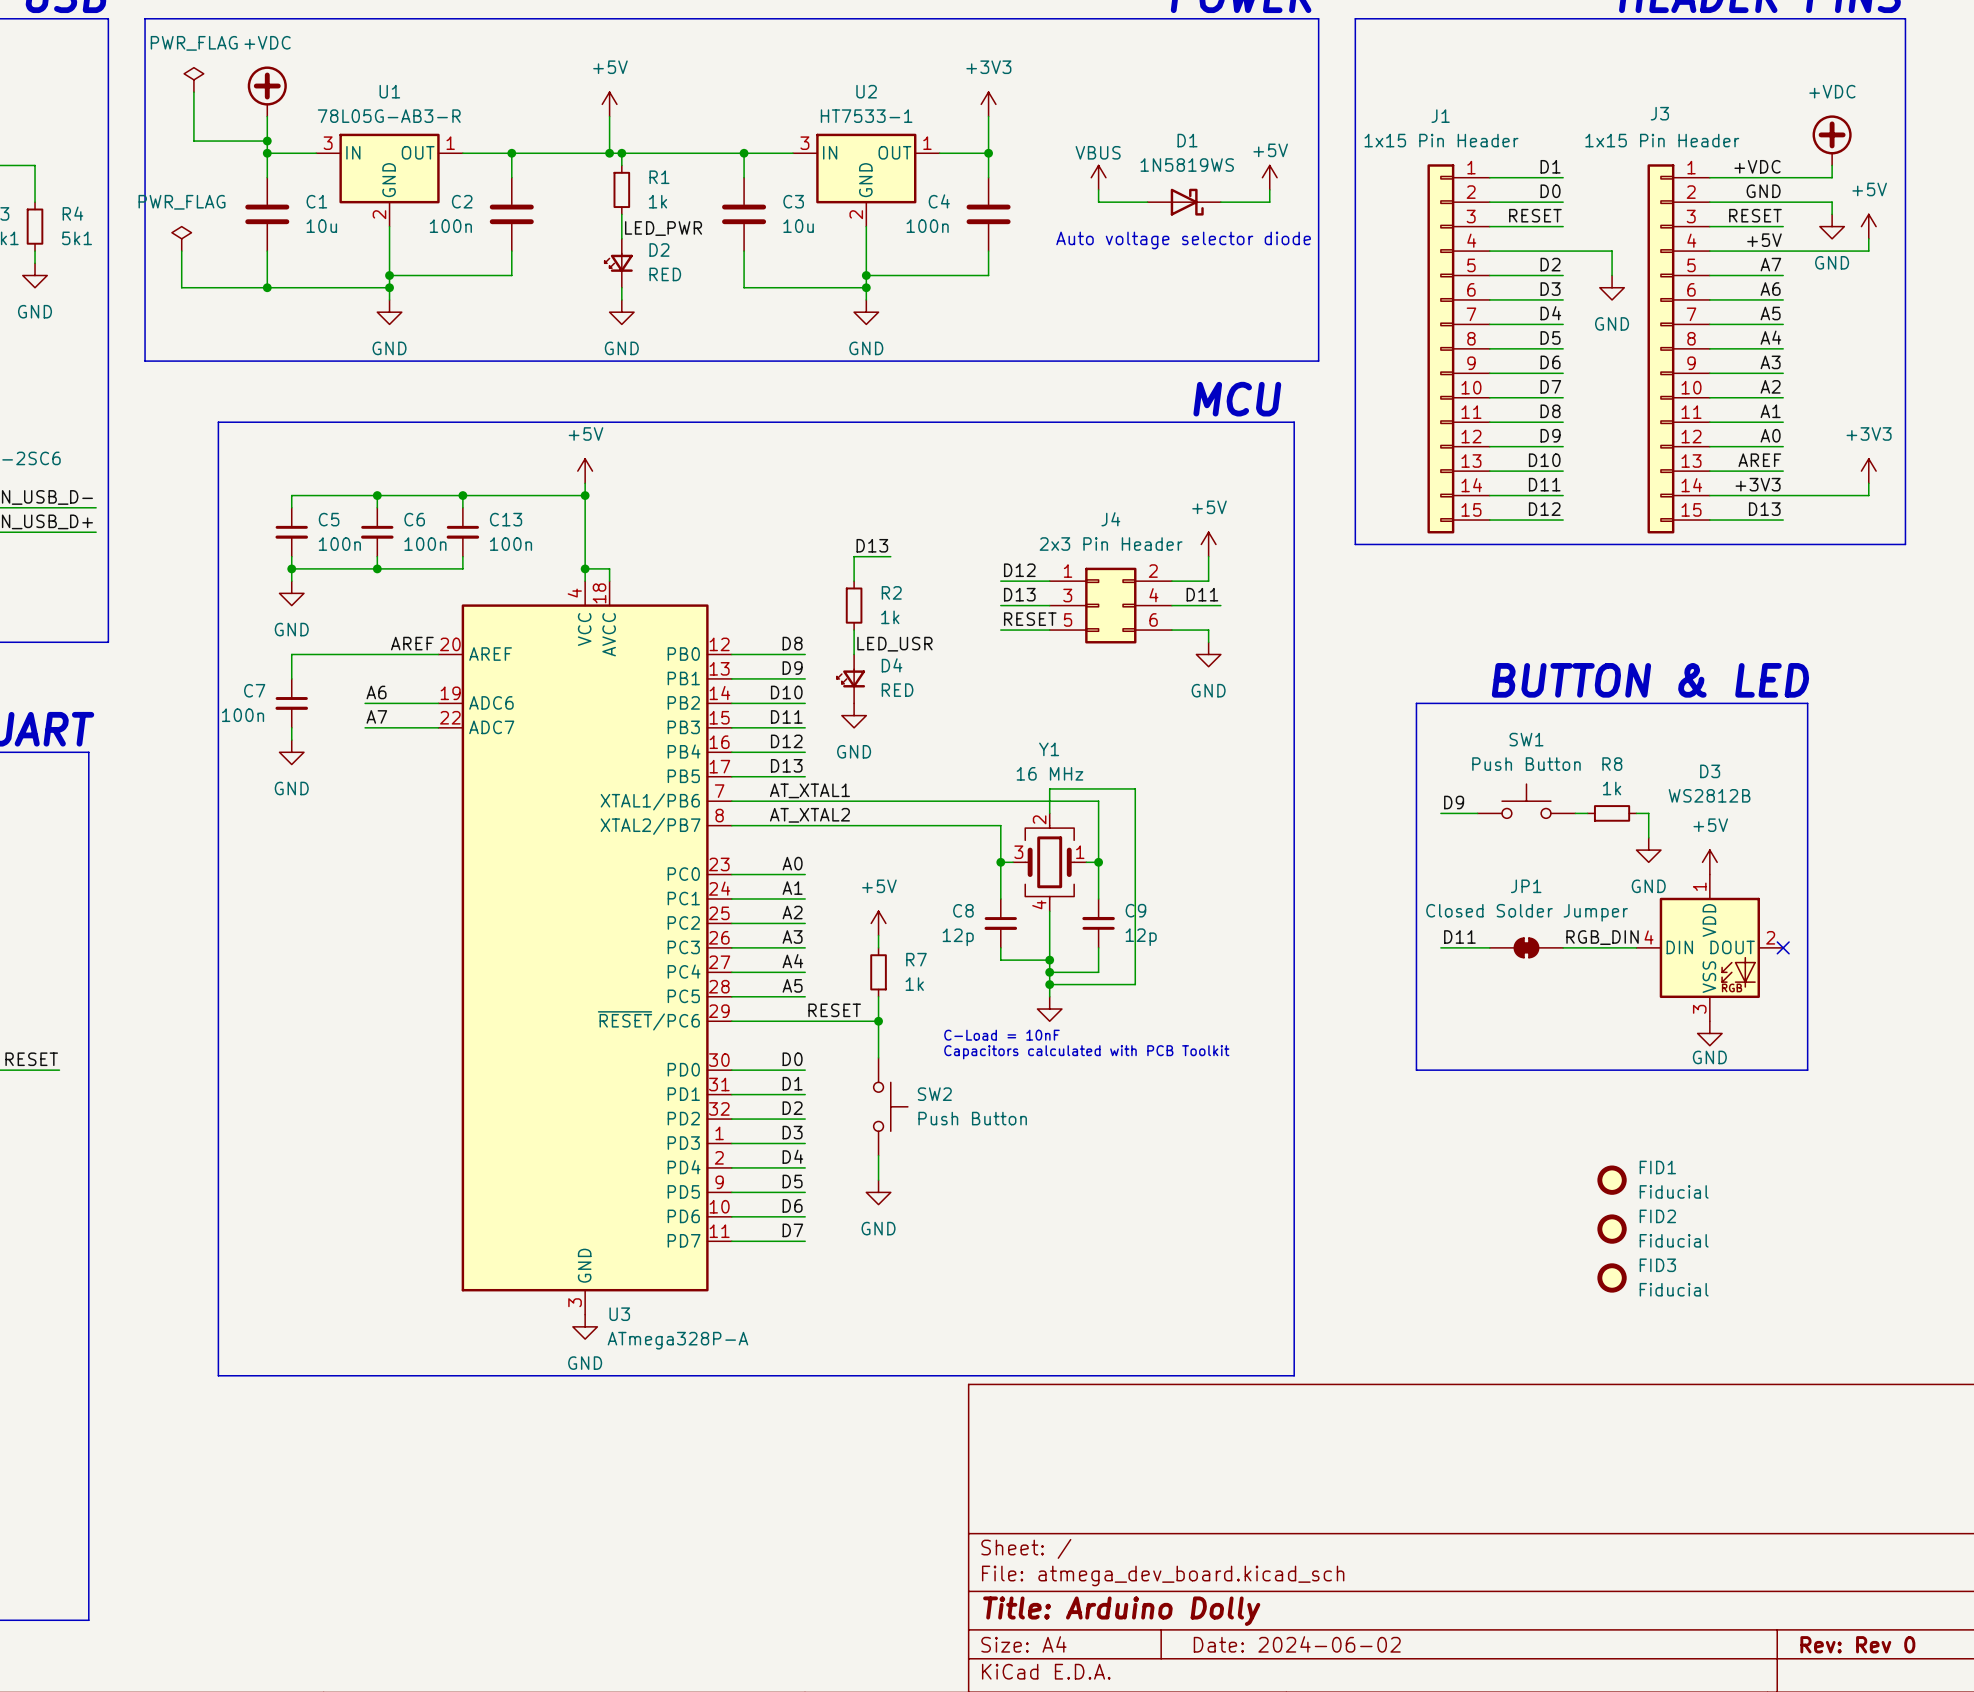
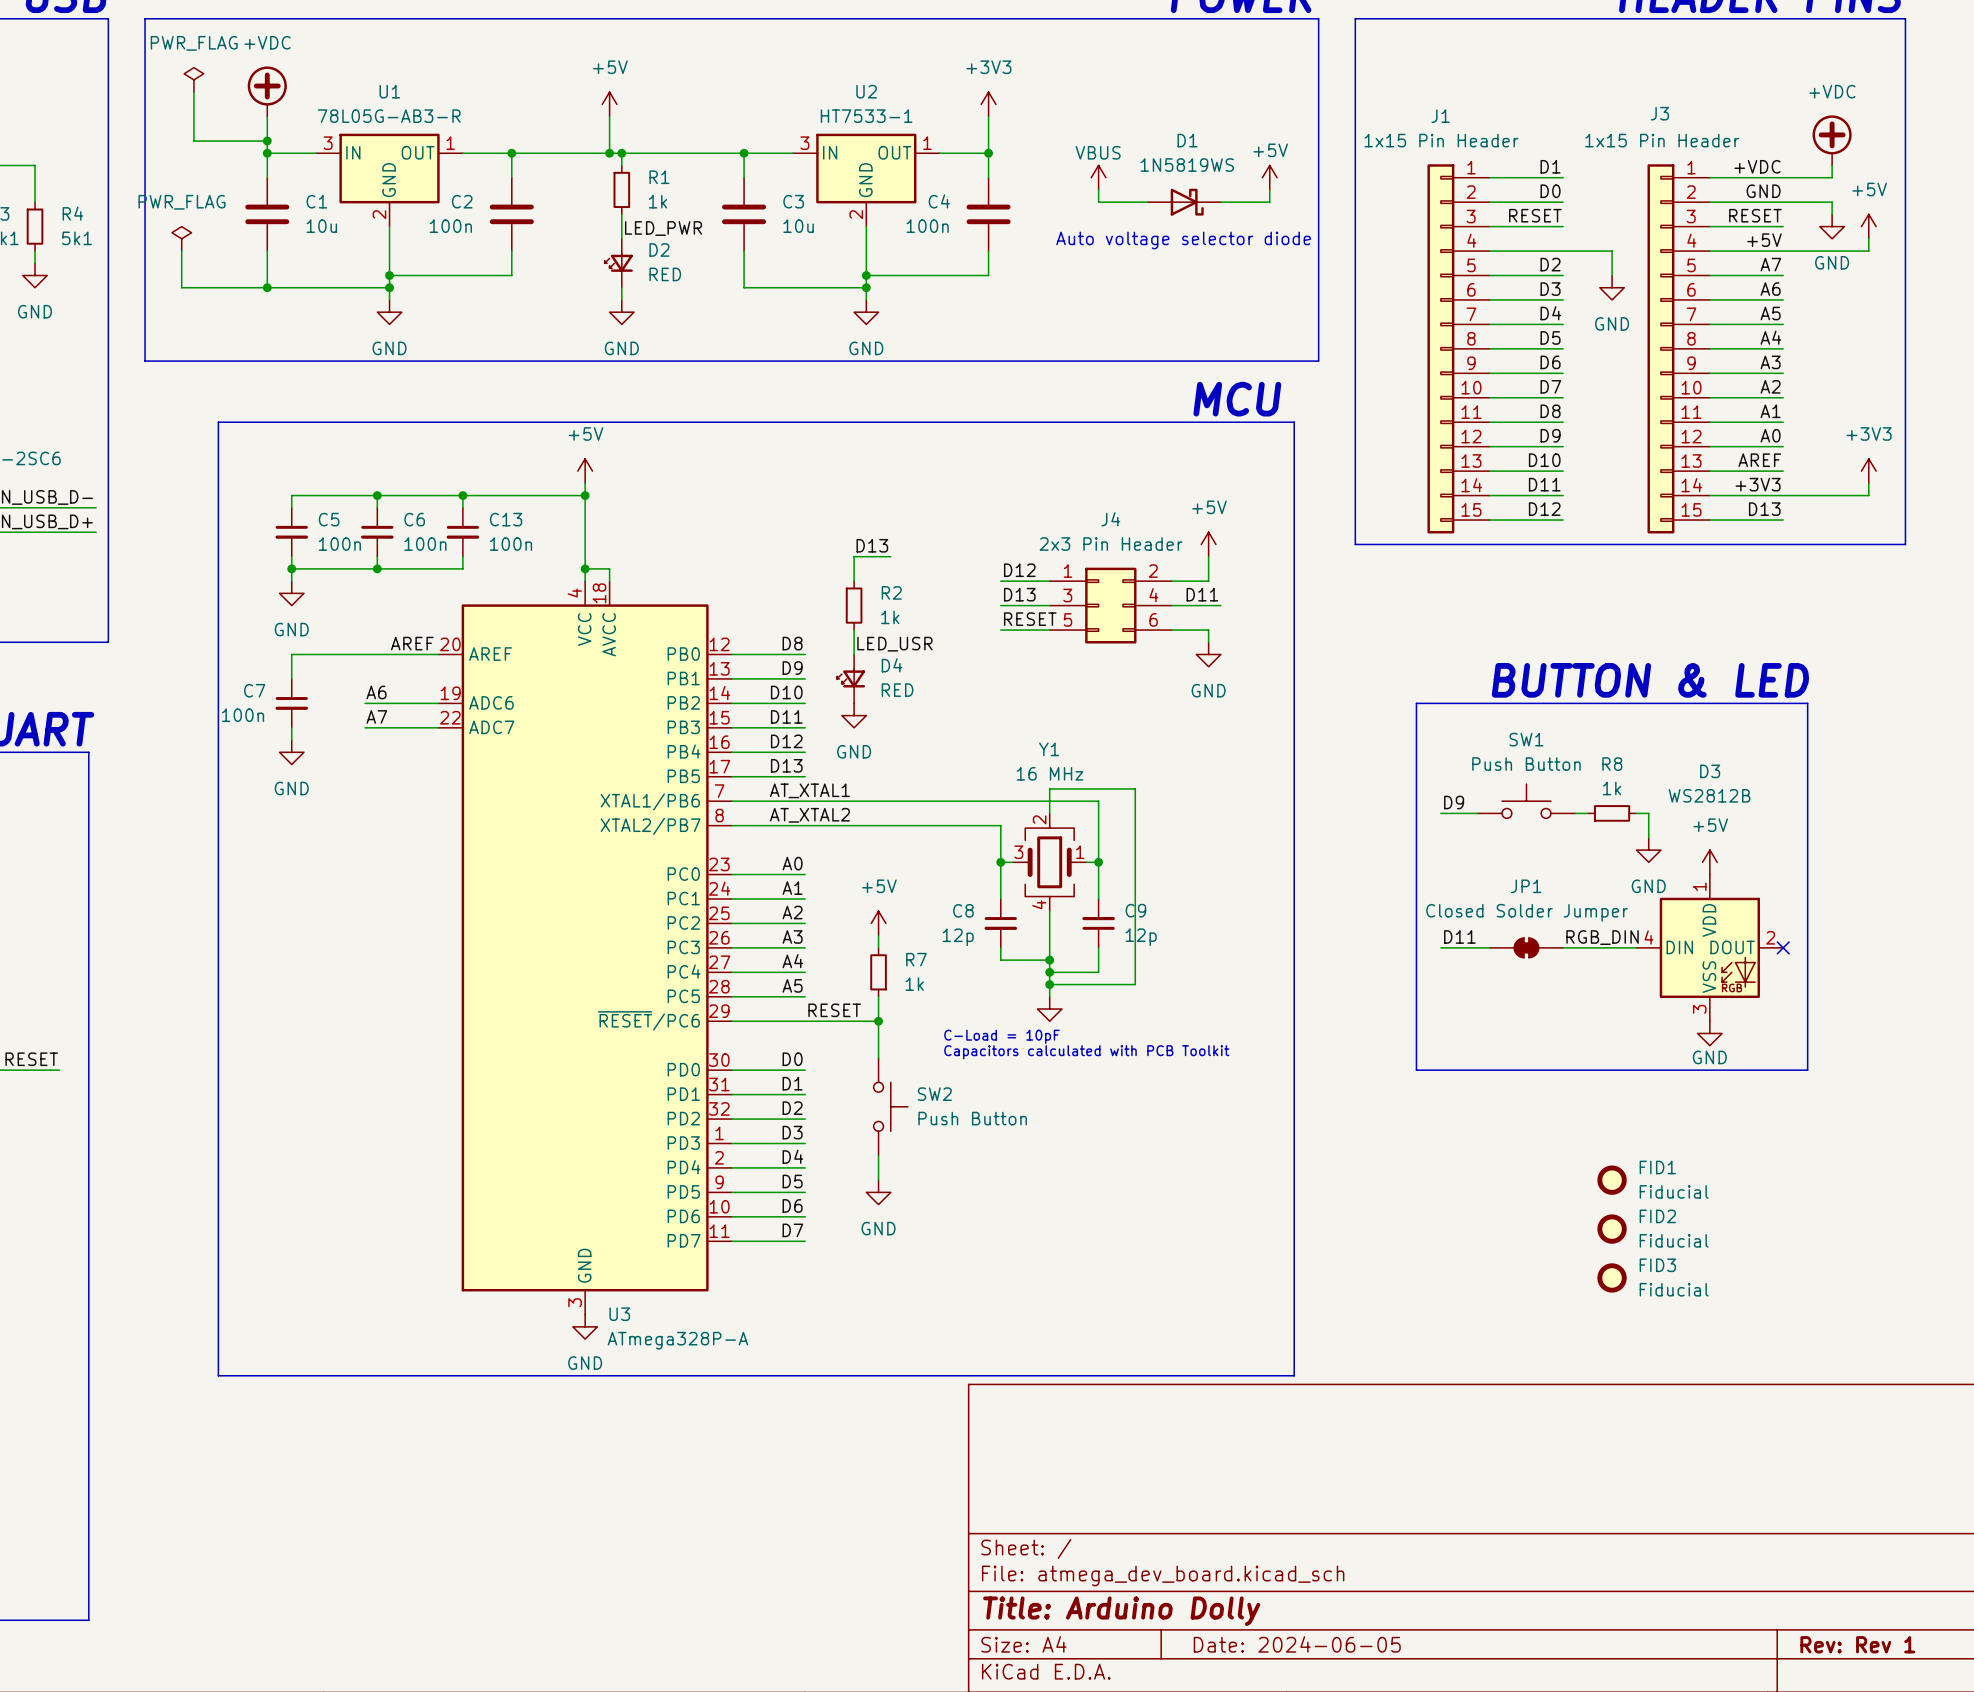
text: C-Load = 10nF (1001, 1035) -> C-Load = 10pF (1001, 1036)
title block: Date: 2024-06-02 (1297, 1644) -> Date: 2024-06-05 (1297, 1644)
title block: Rev: Rev 0 (1857, 1644) -> Rev: Rev 1 (1857, 1644)

